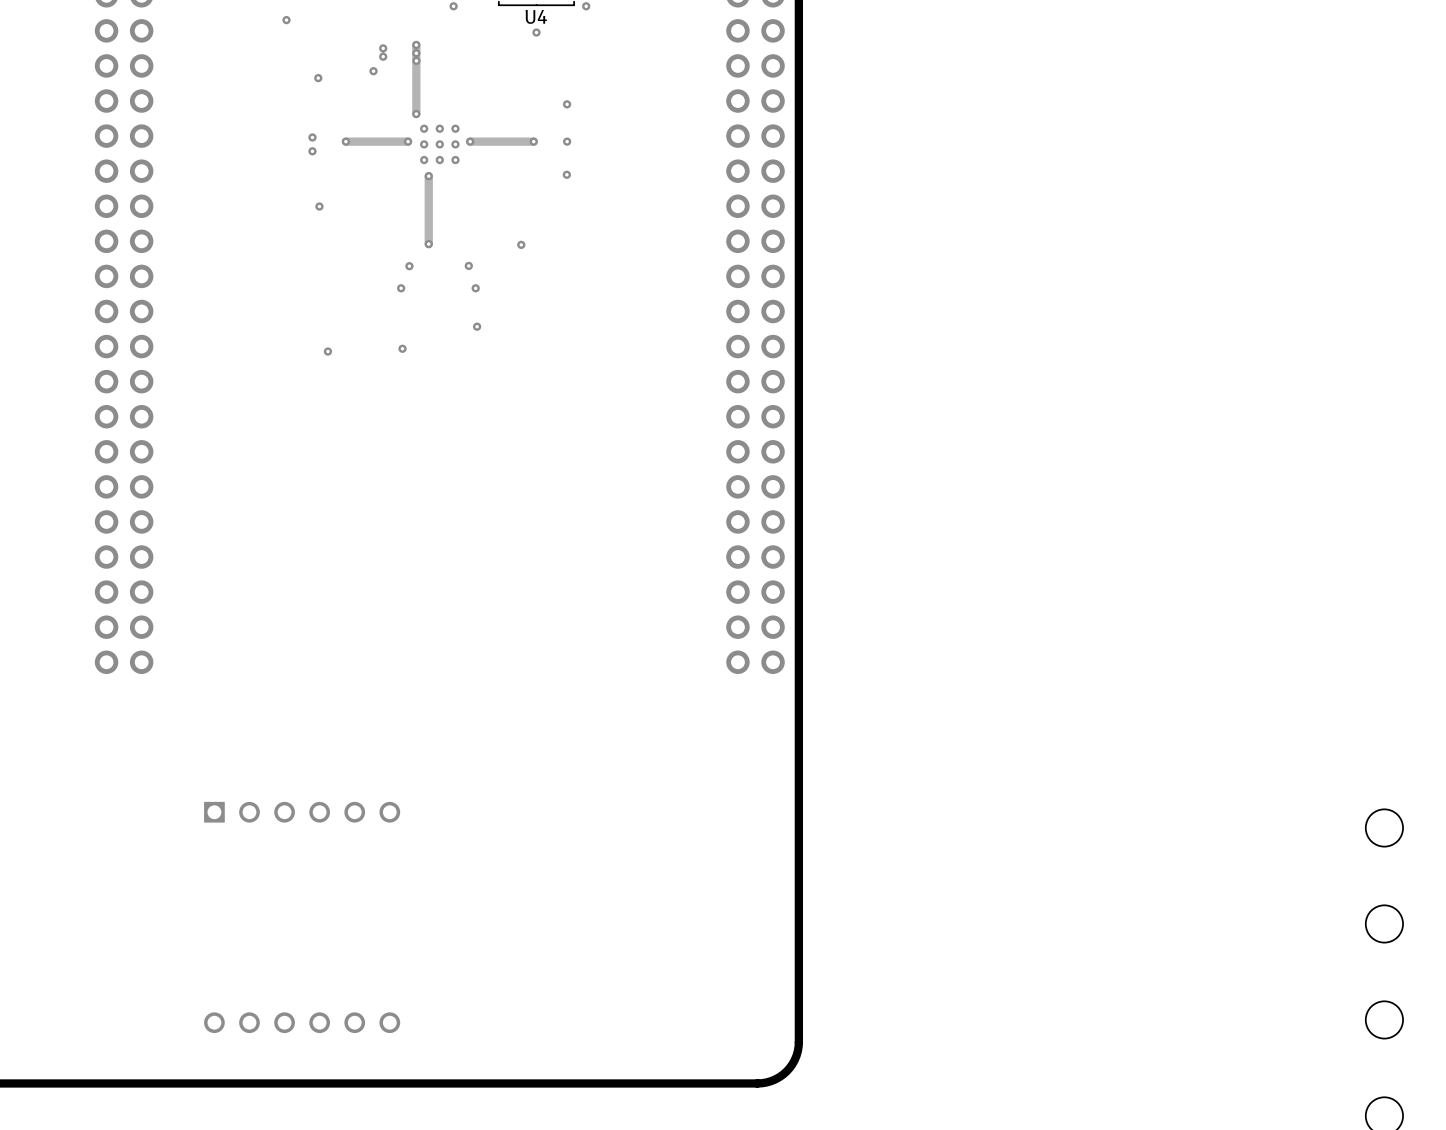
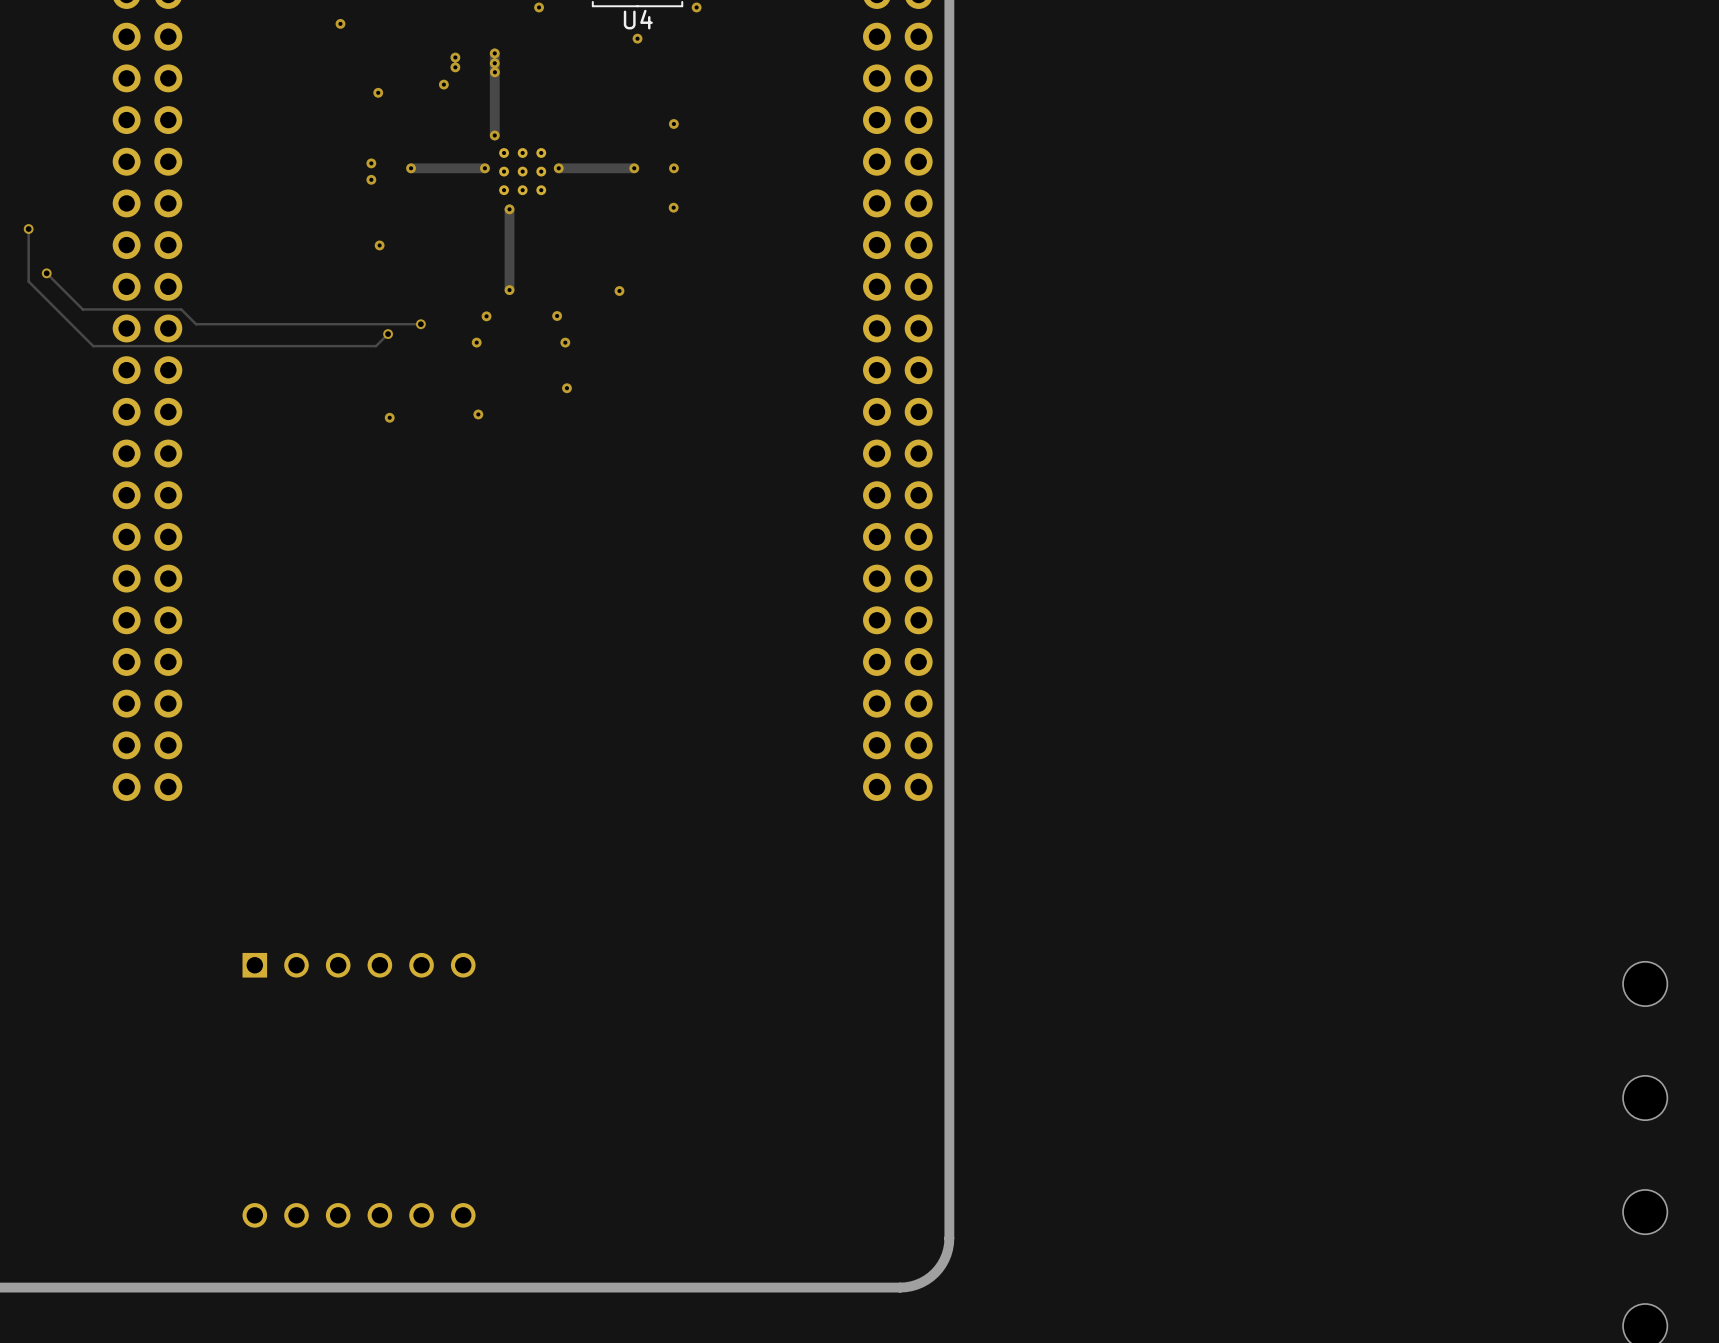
track: none -> (28, 229) (28, 281) (93, 346) (376, 346) (388, 334)
via: none -> (28, 229)
track: none -> (46, 273) (82, 309) (181, 309) (196, 324) (420, 324)
via: none -> (46, 273)
via: none -> (420, 324)
via: none -> (388, 334)

